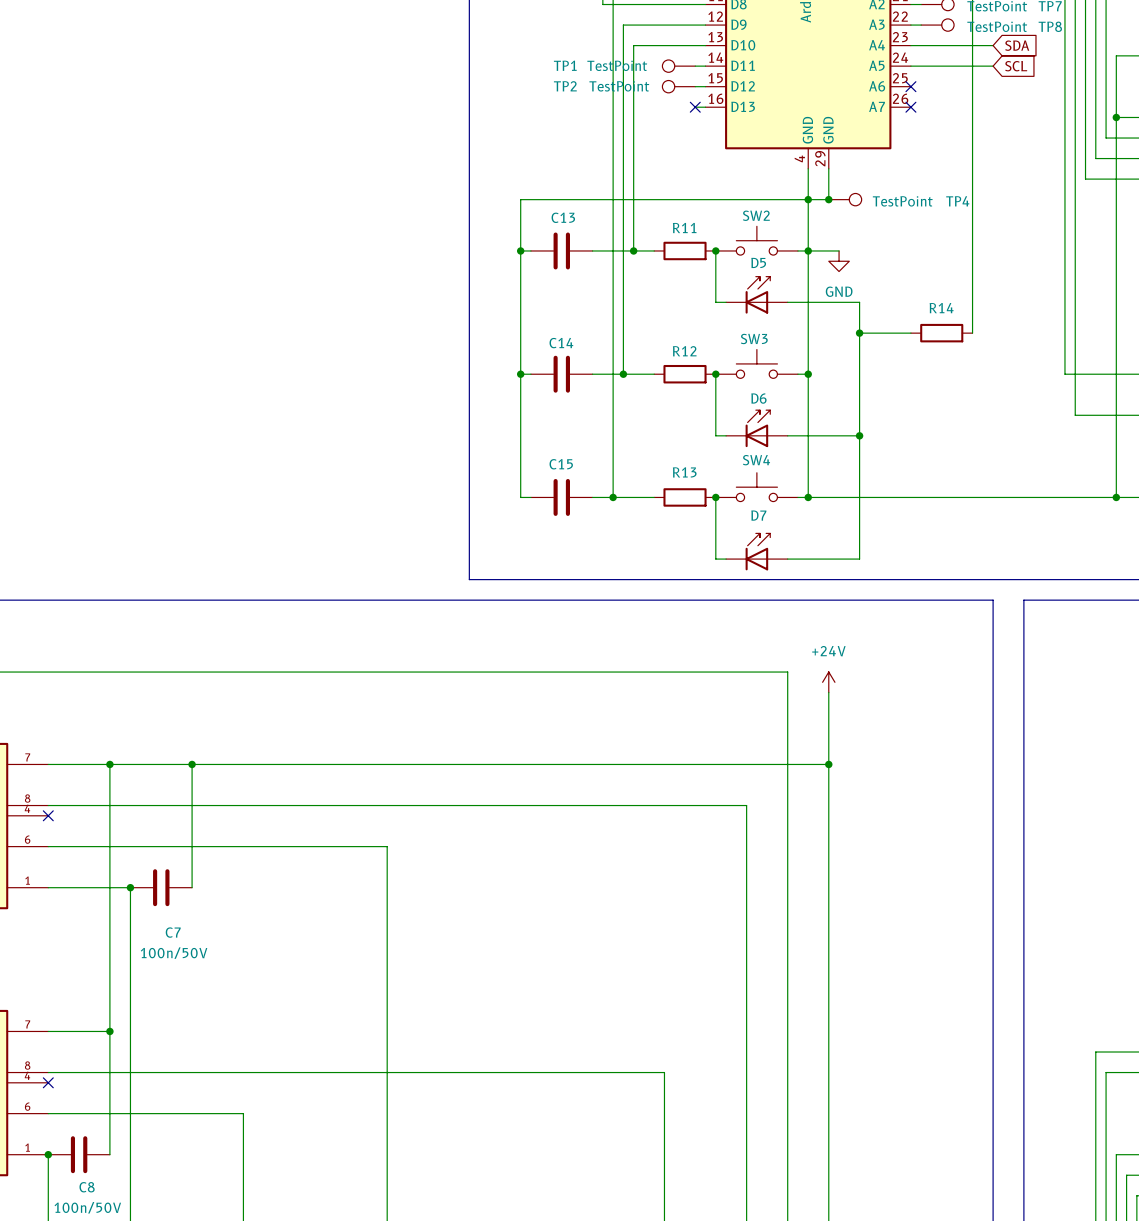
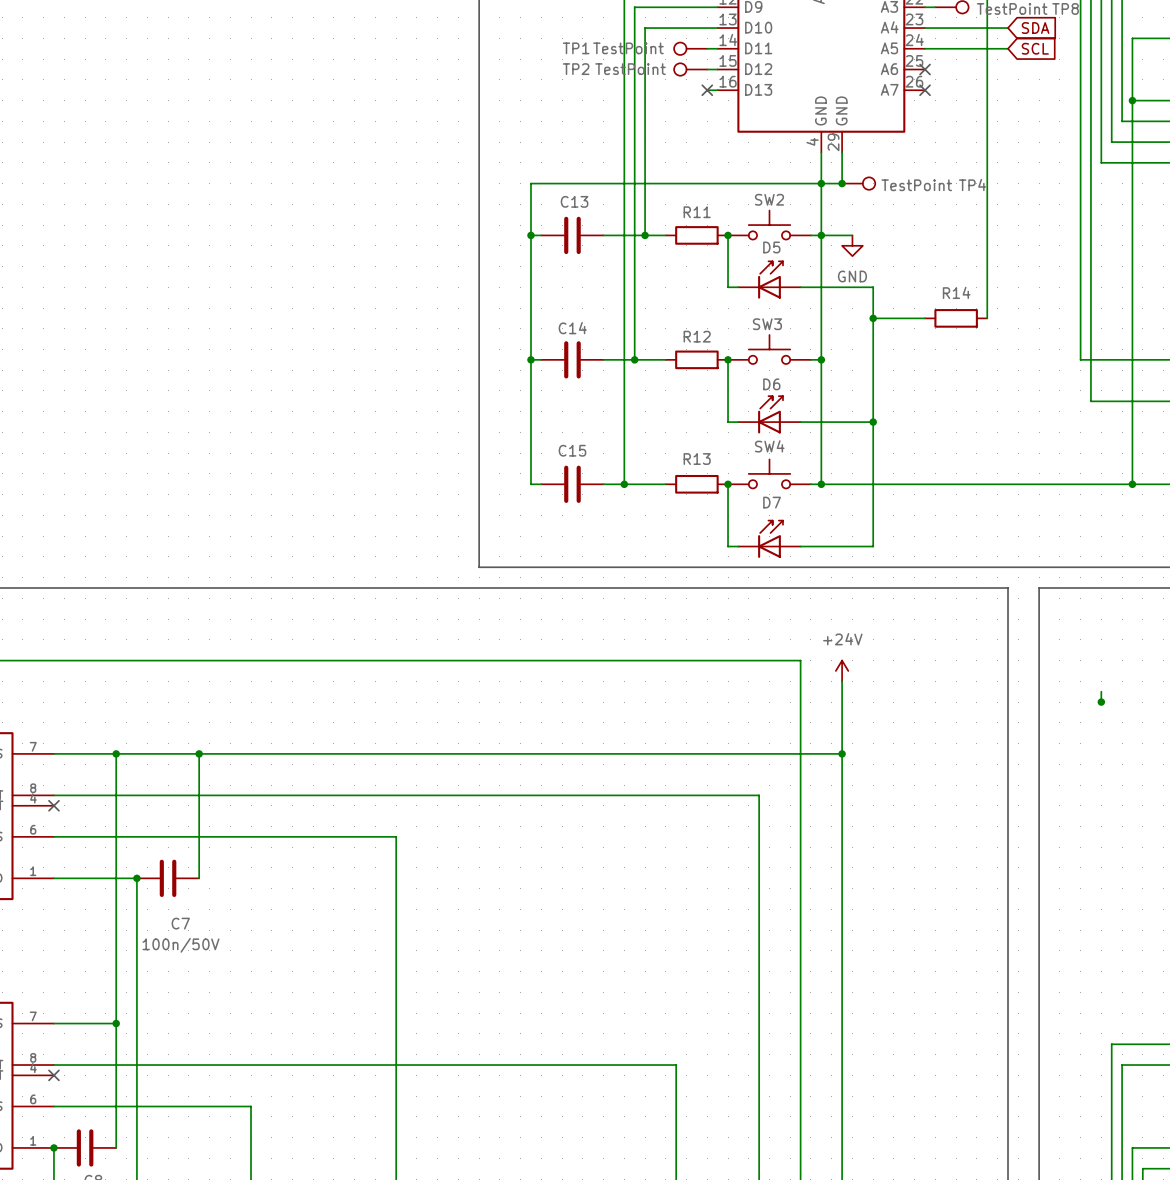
wire: none -> (1101, 691) (1101, 702)
junction: none -> (1101, 702)

